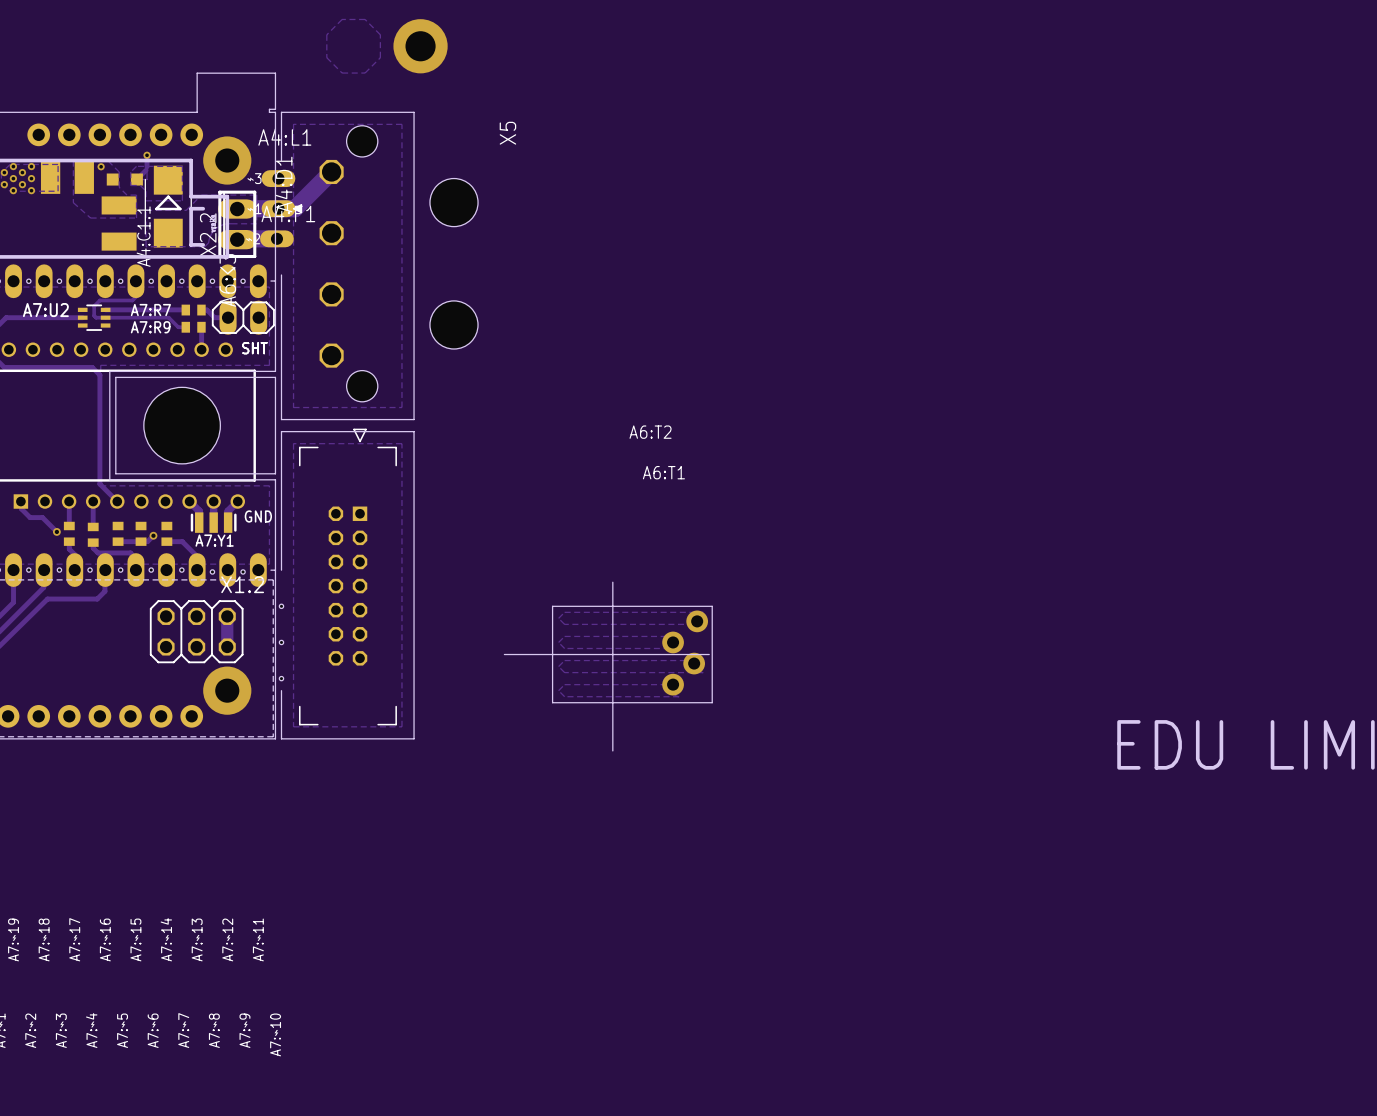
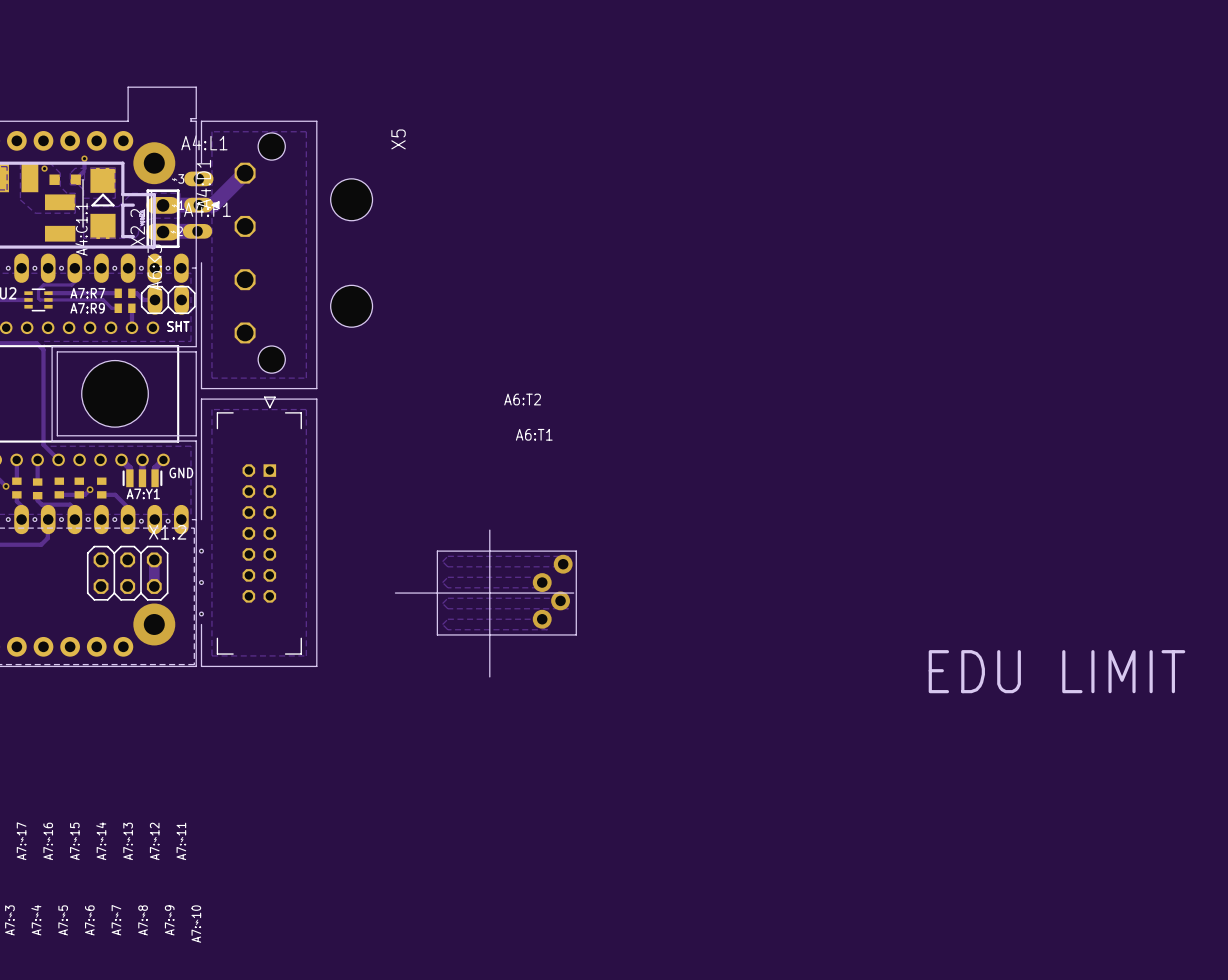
zone outline: (342, 19) (365, 19) (380, 34) (380, 57) (365, 73) (342, 73) (326, 57) (326, 34) (342, 19) -> none
via: (420, 46) -> none

